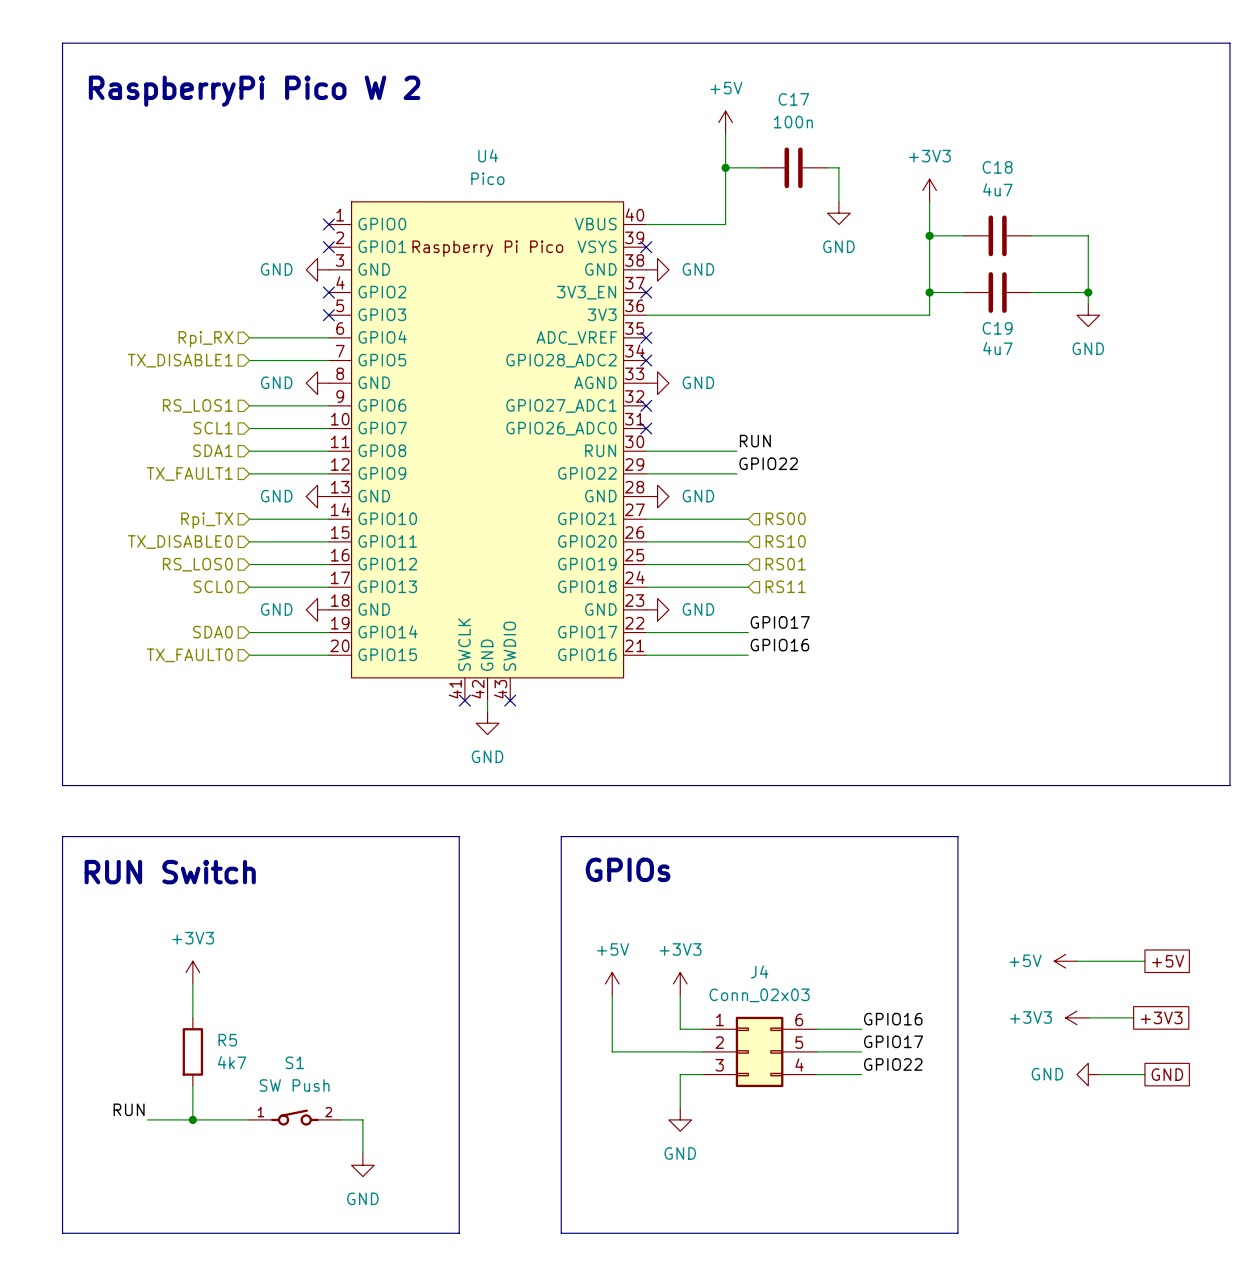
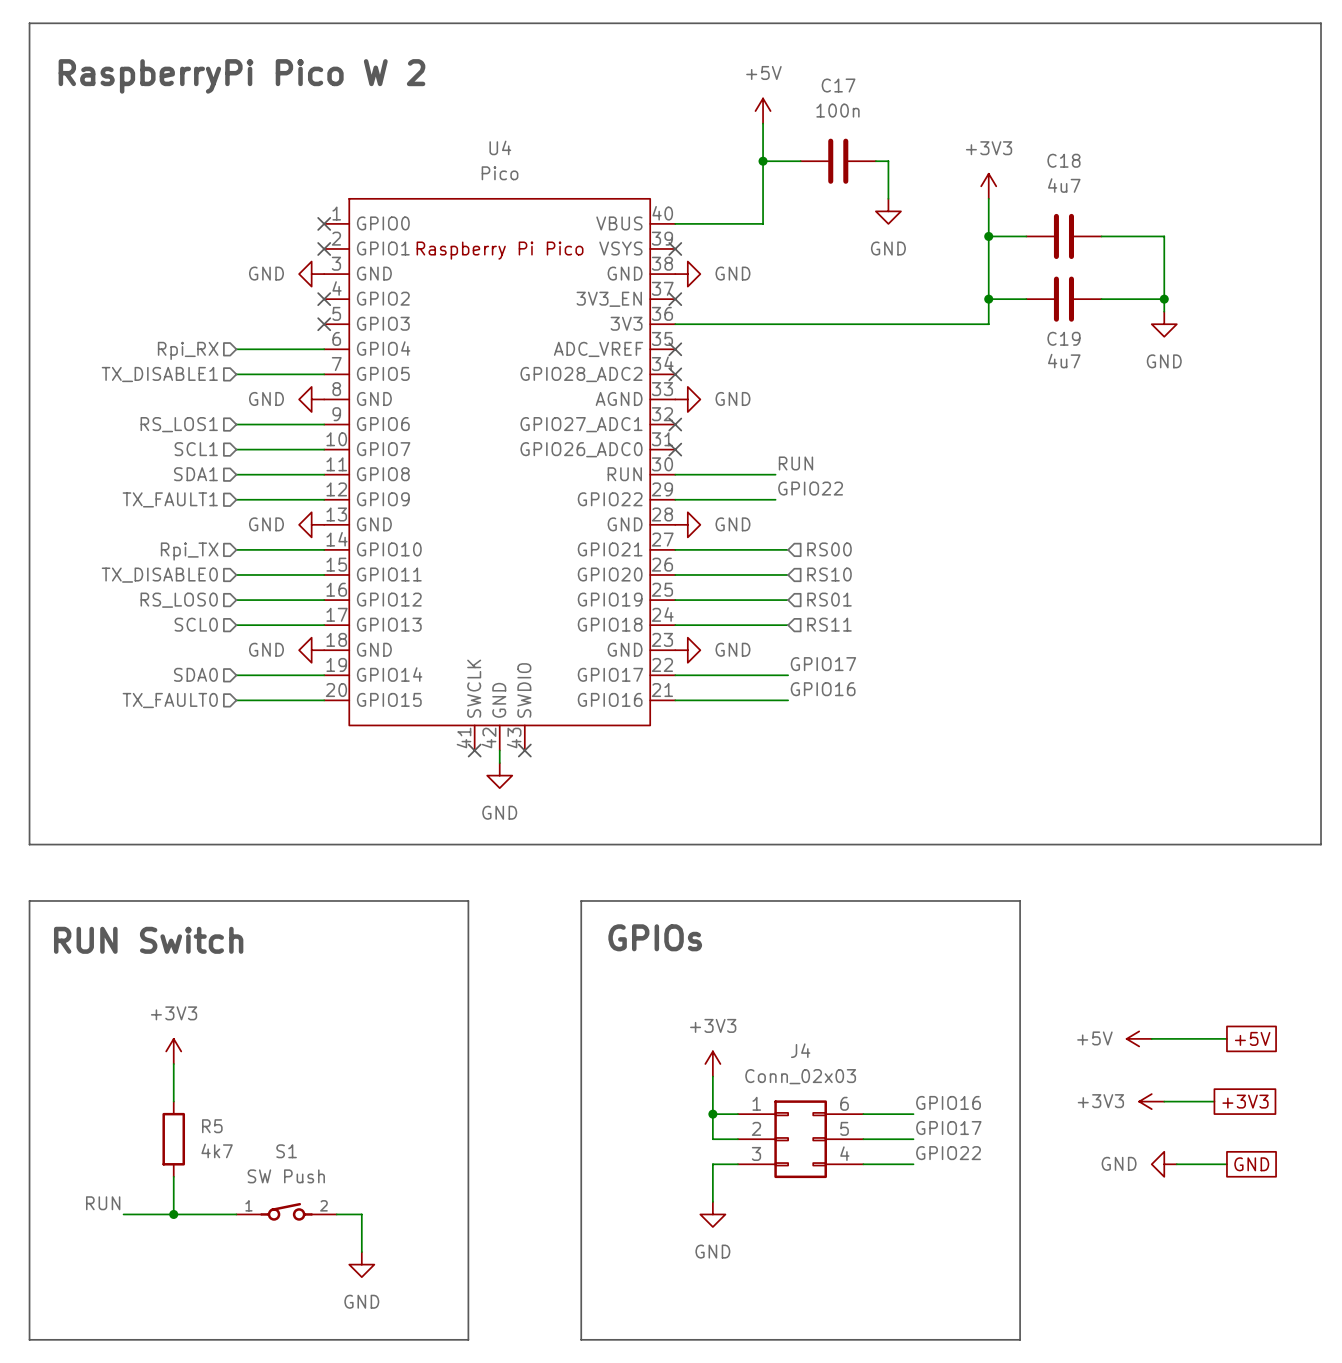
power symbol: +5V (612, 983) -> none
wire: (612, 995) (612, 1051) (680, 1051) -> (712, 1114) (712, 1139)
junction: none -> (712, 1114)

